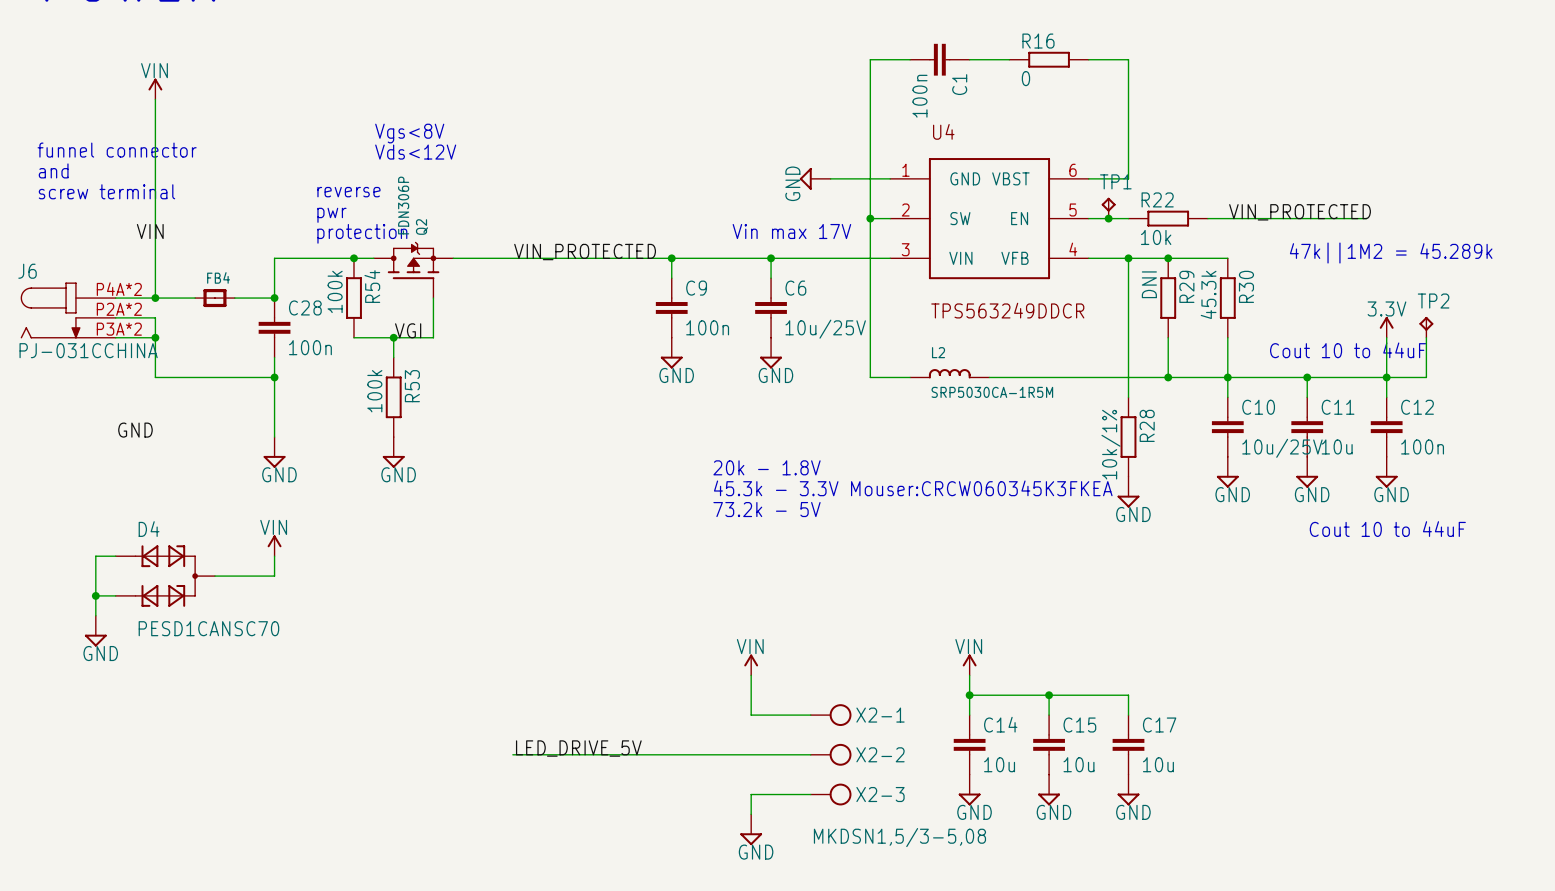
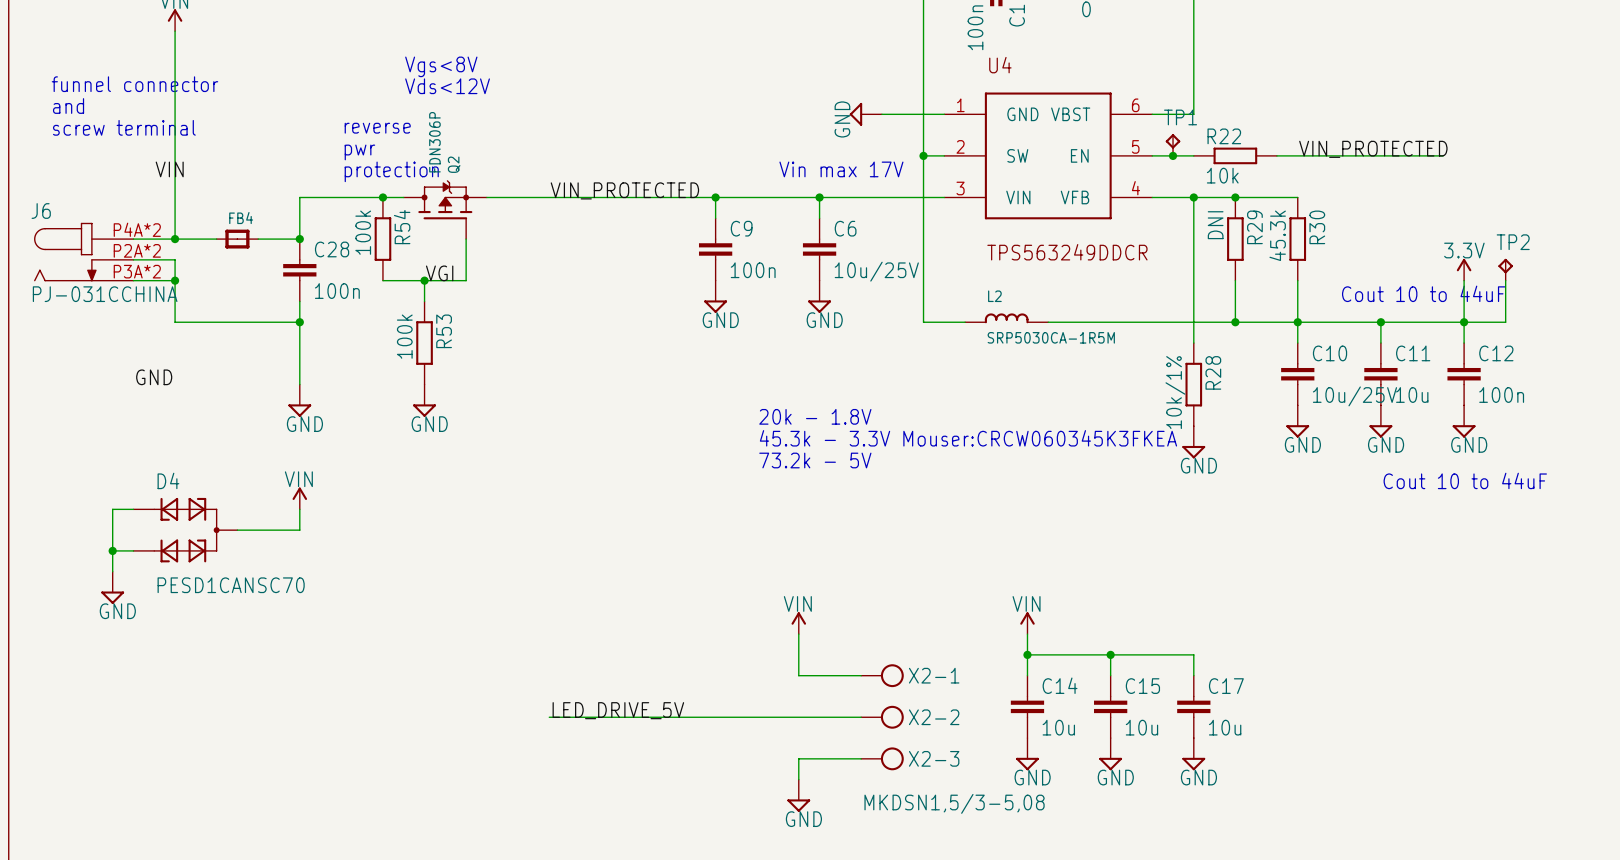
text: 47k||1M2 = 45.289k (1391, 253) -> none

